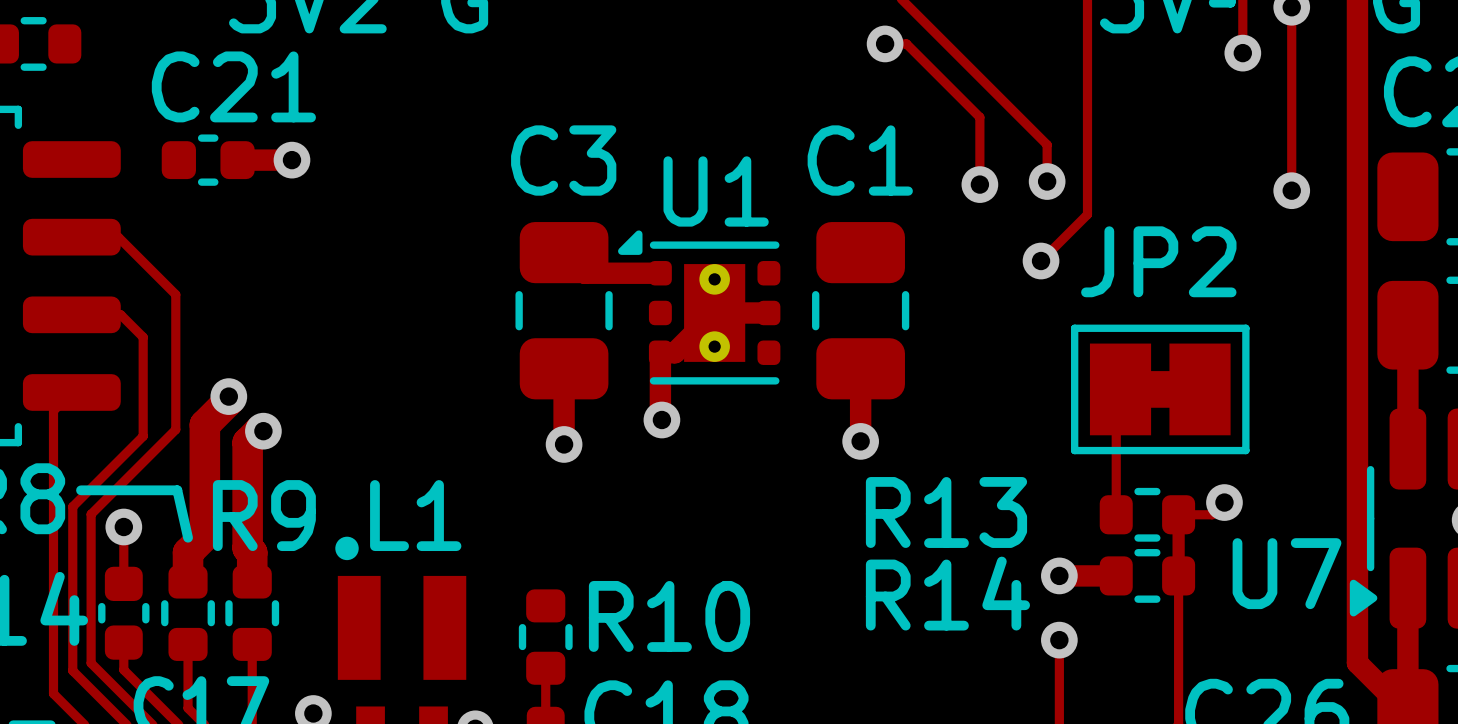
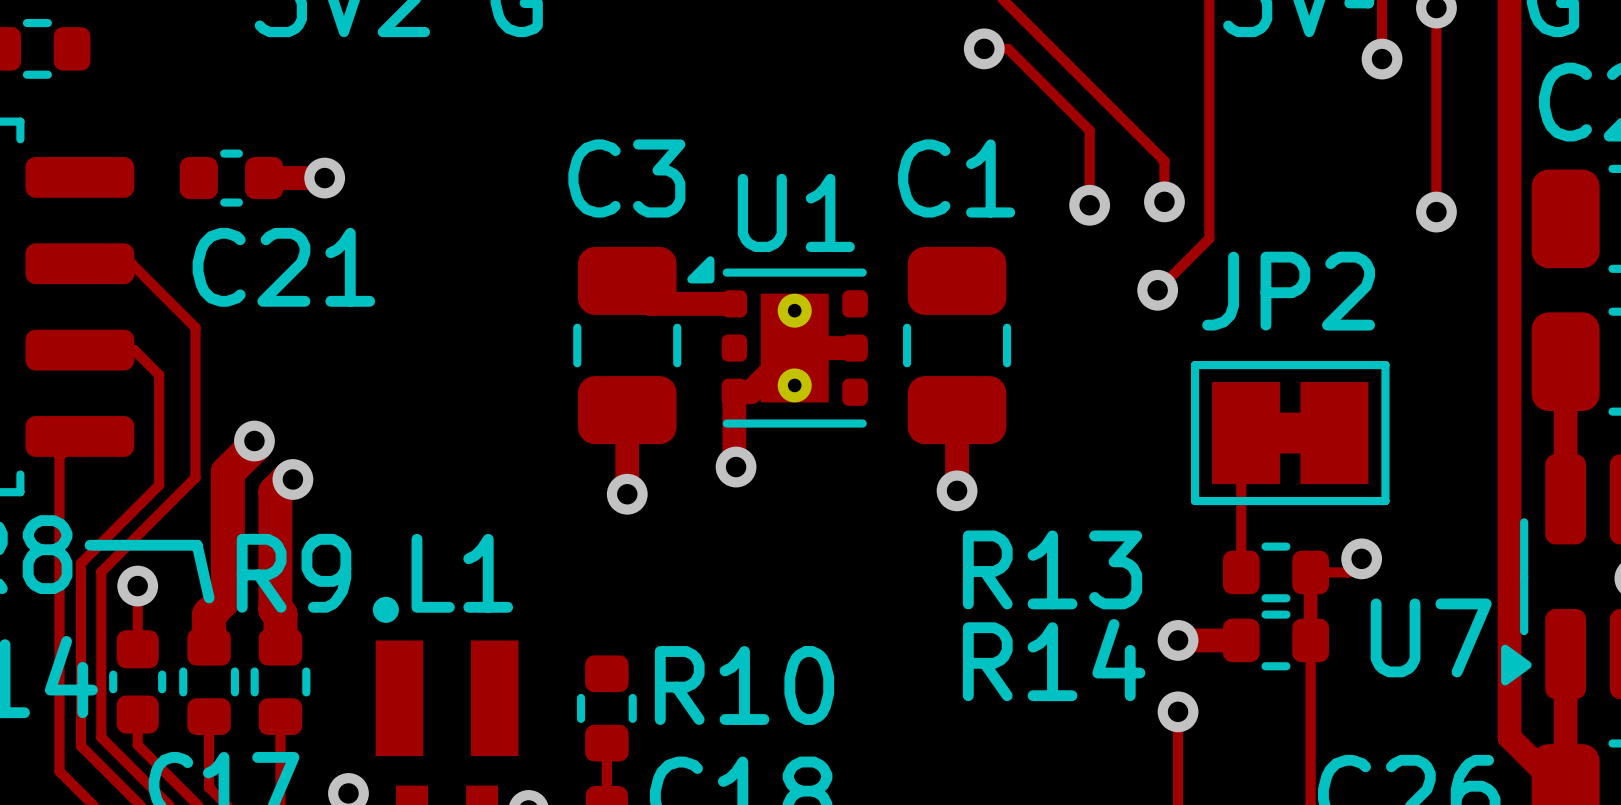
C21 name position: C21 (233, 86) -> C21 (283, 267)

